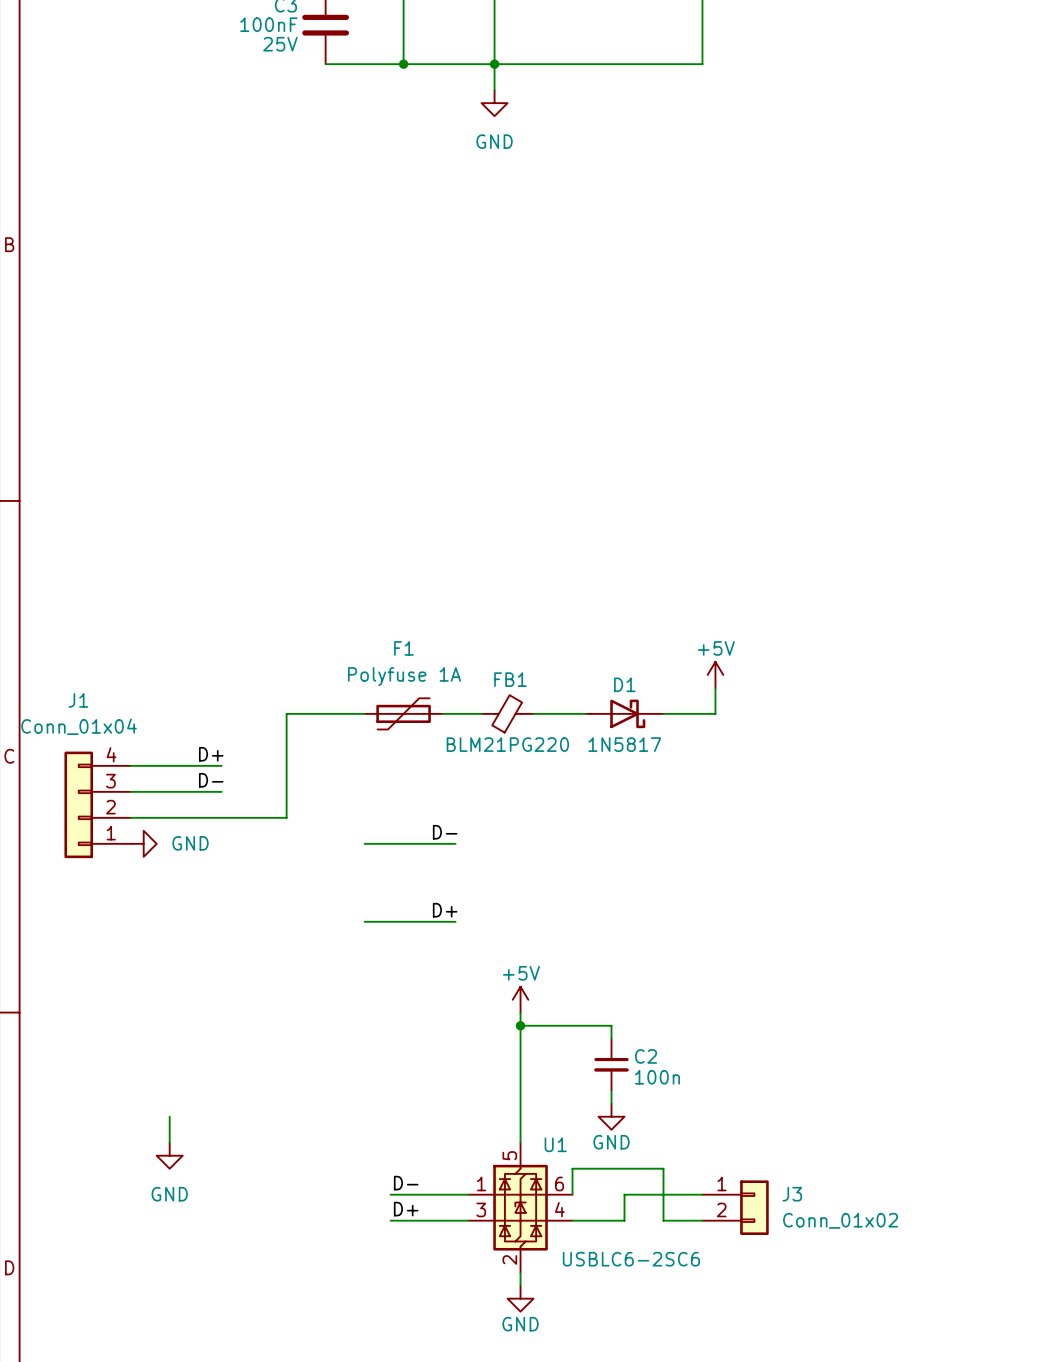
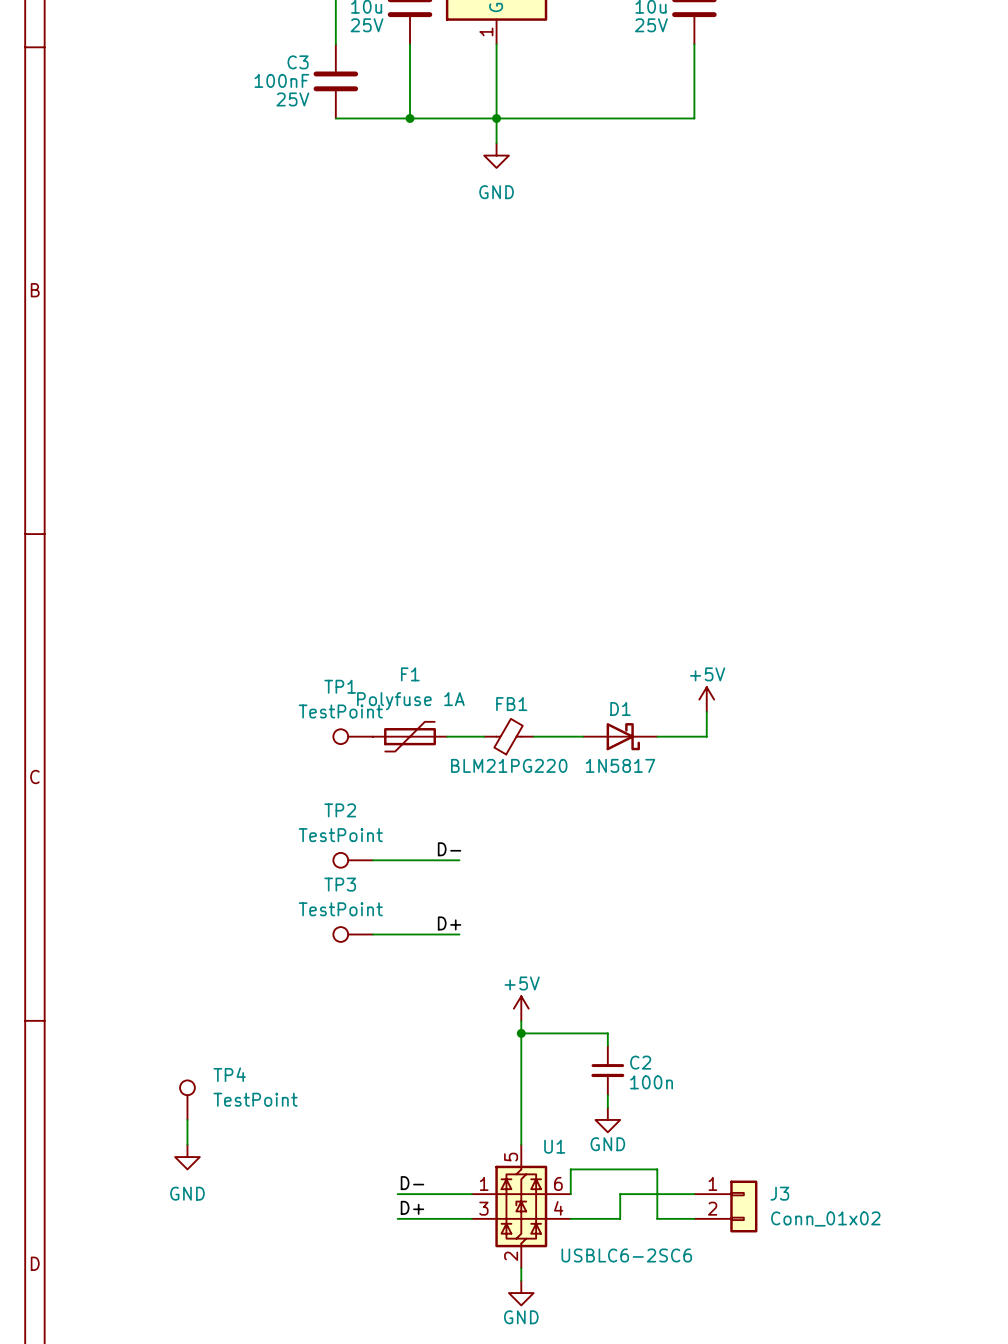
TP1: none -> TestPoint (353, 736)
wire: (364, 713) (286, 713) (286, 817) (130, 817) -> none
label: D+ (211, 754) -> none
wire: (130, 765) (221, 765) -> none
label: D- (211, 780) -> none
wire: (130, 791) (221, 791) -> none
J1: Conn_01x04 (97, 804) -> none
power symbol: GND (143, 843) -> none
TP2: none -> TestPoint (353, 860)
TP3: none -> TestPoint (353, 934)
TP4: none -> TestPoint (187, 1100)

